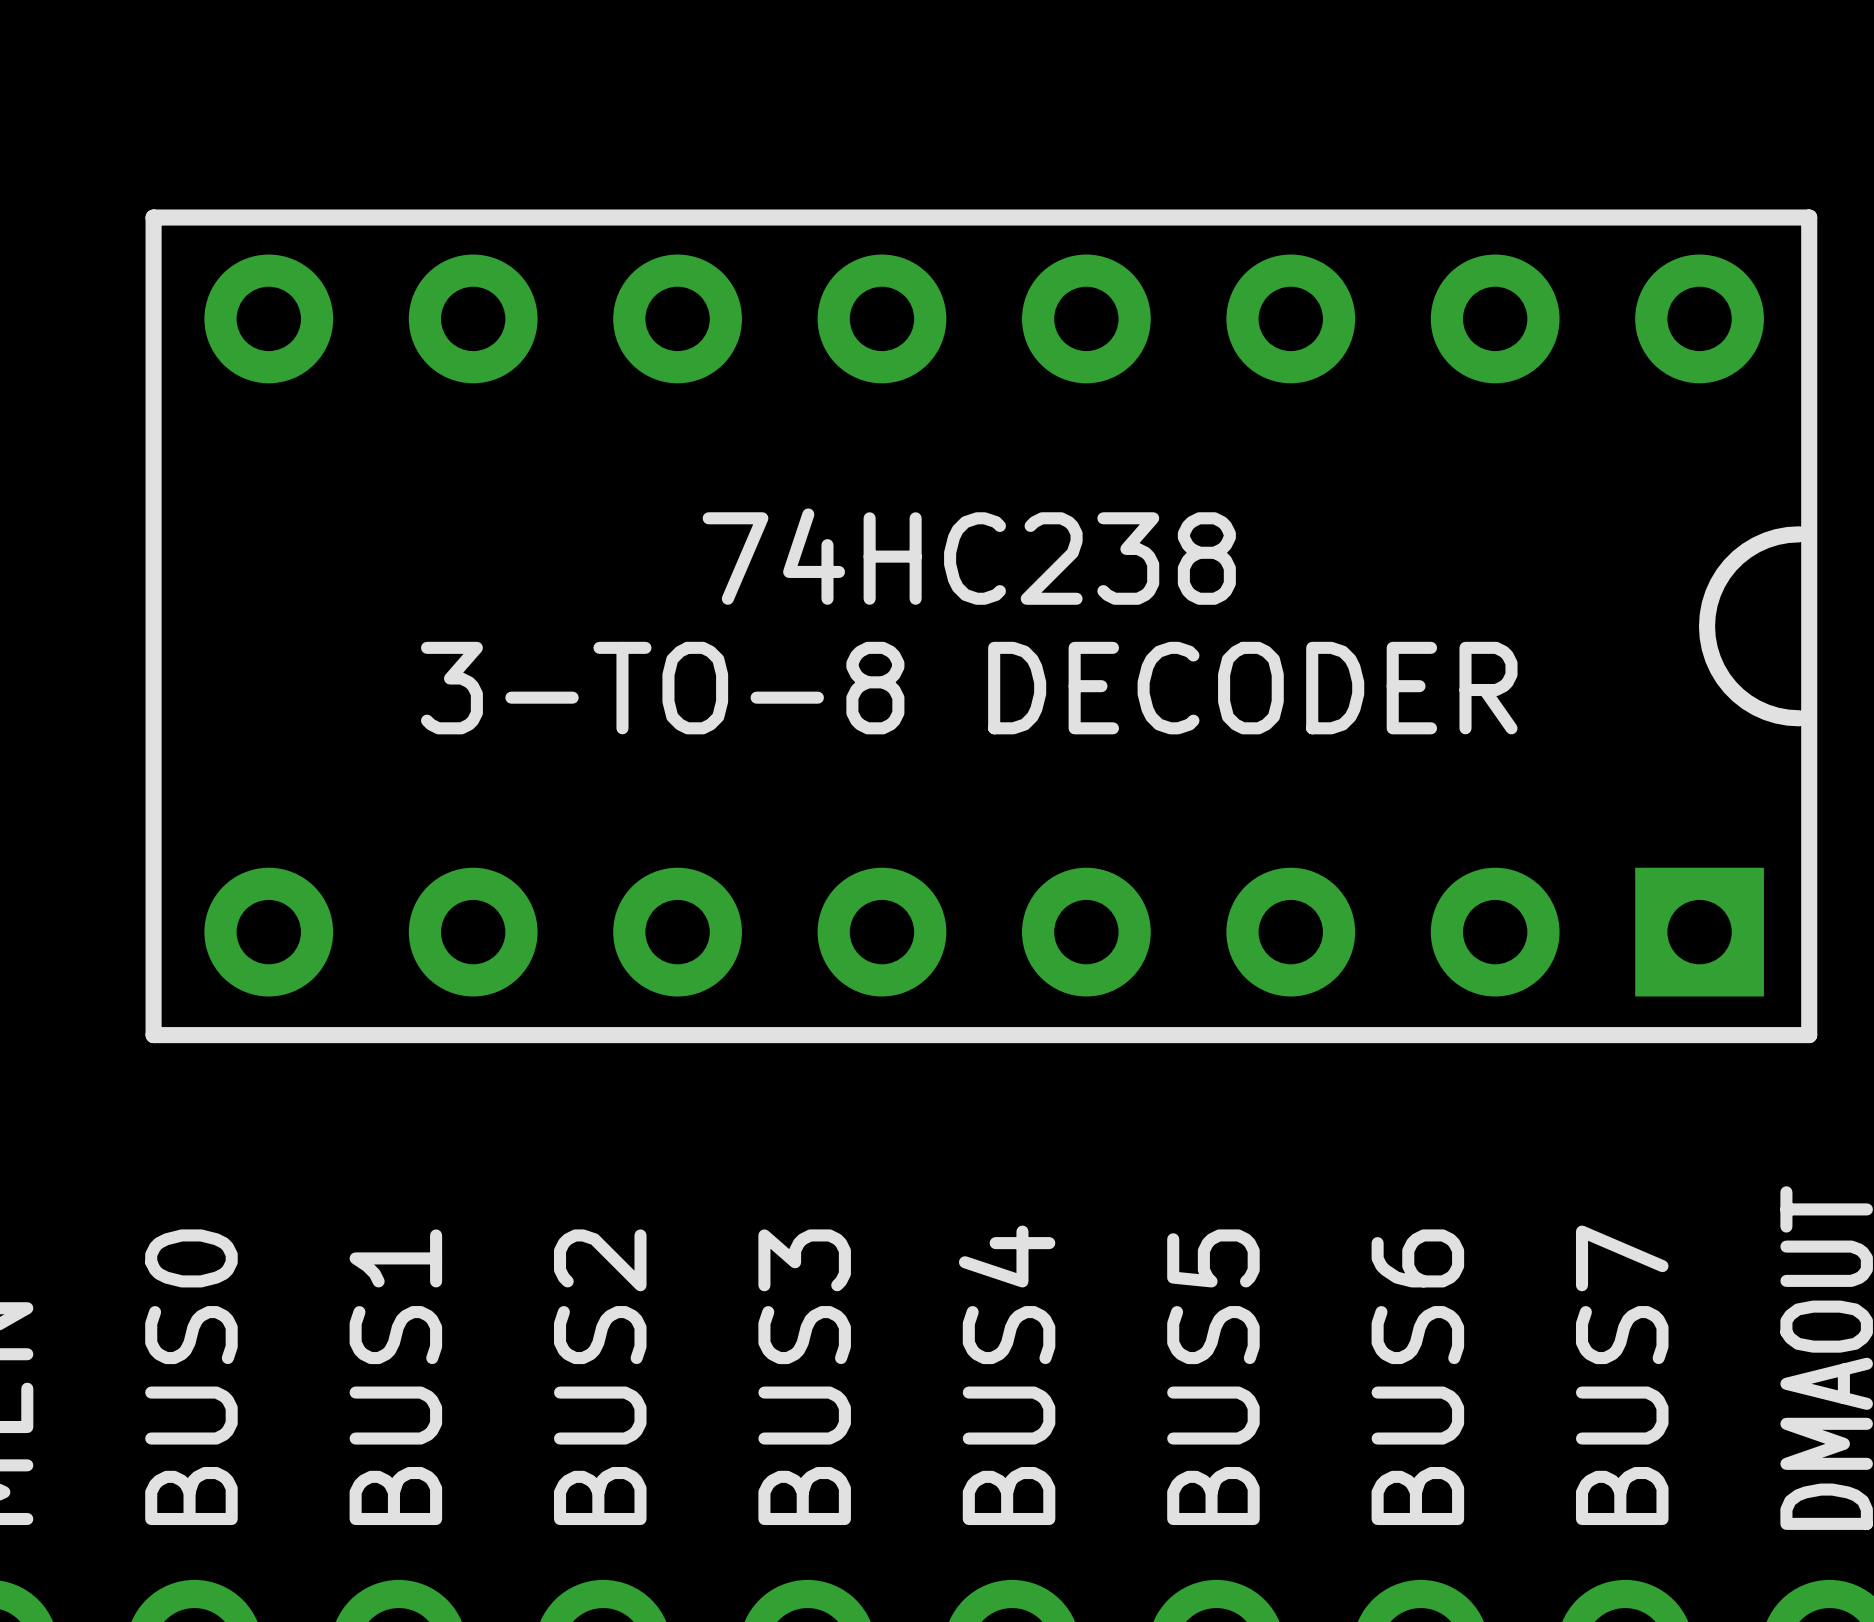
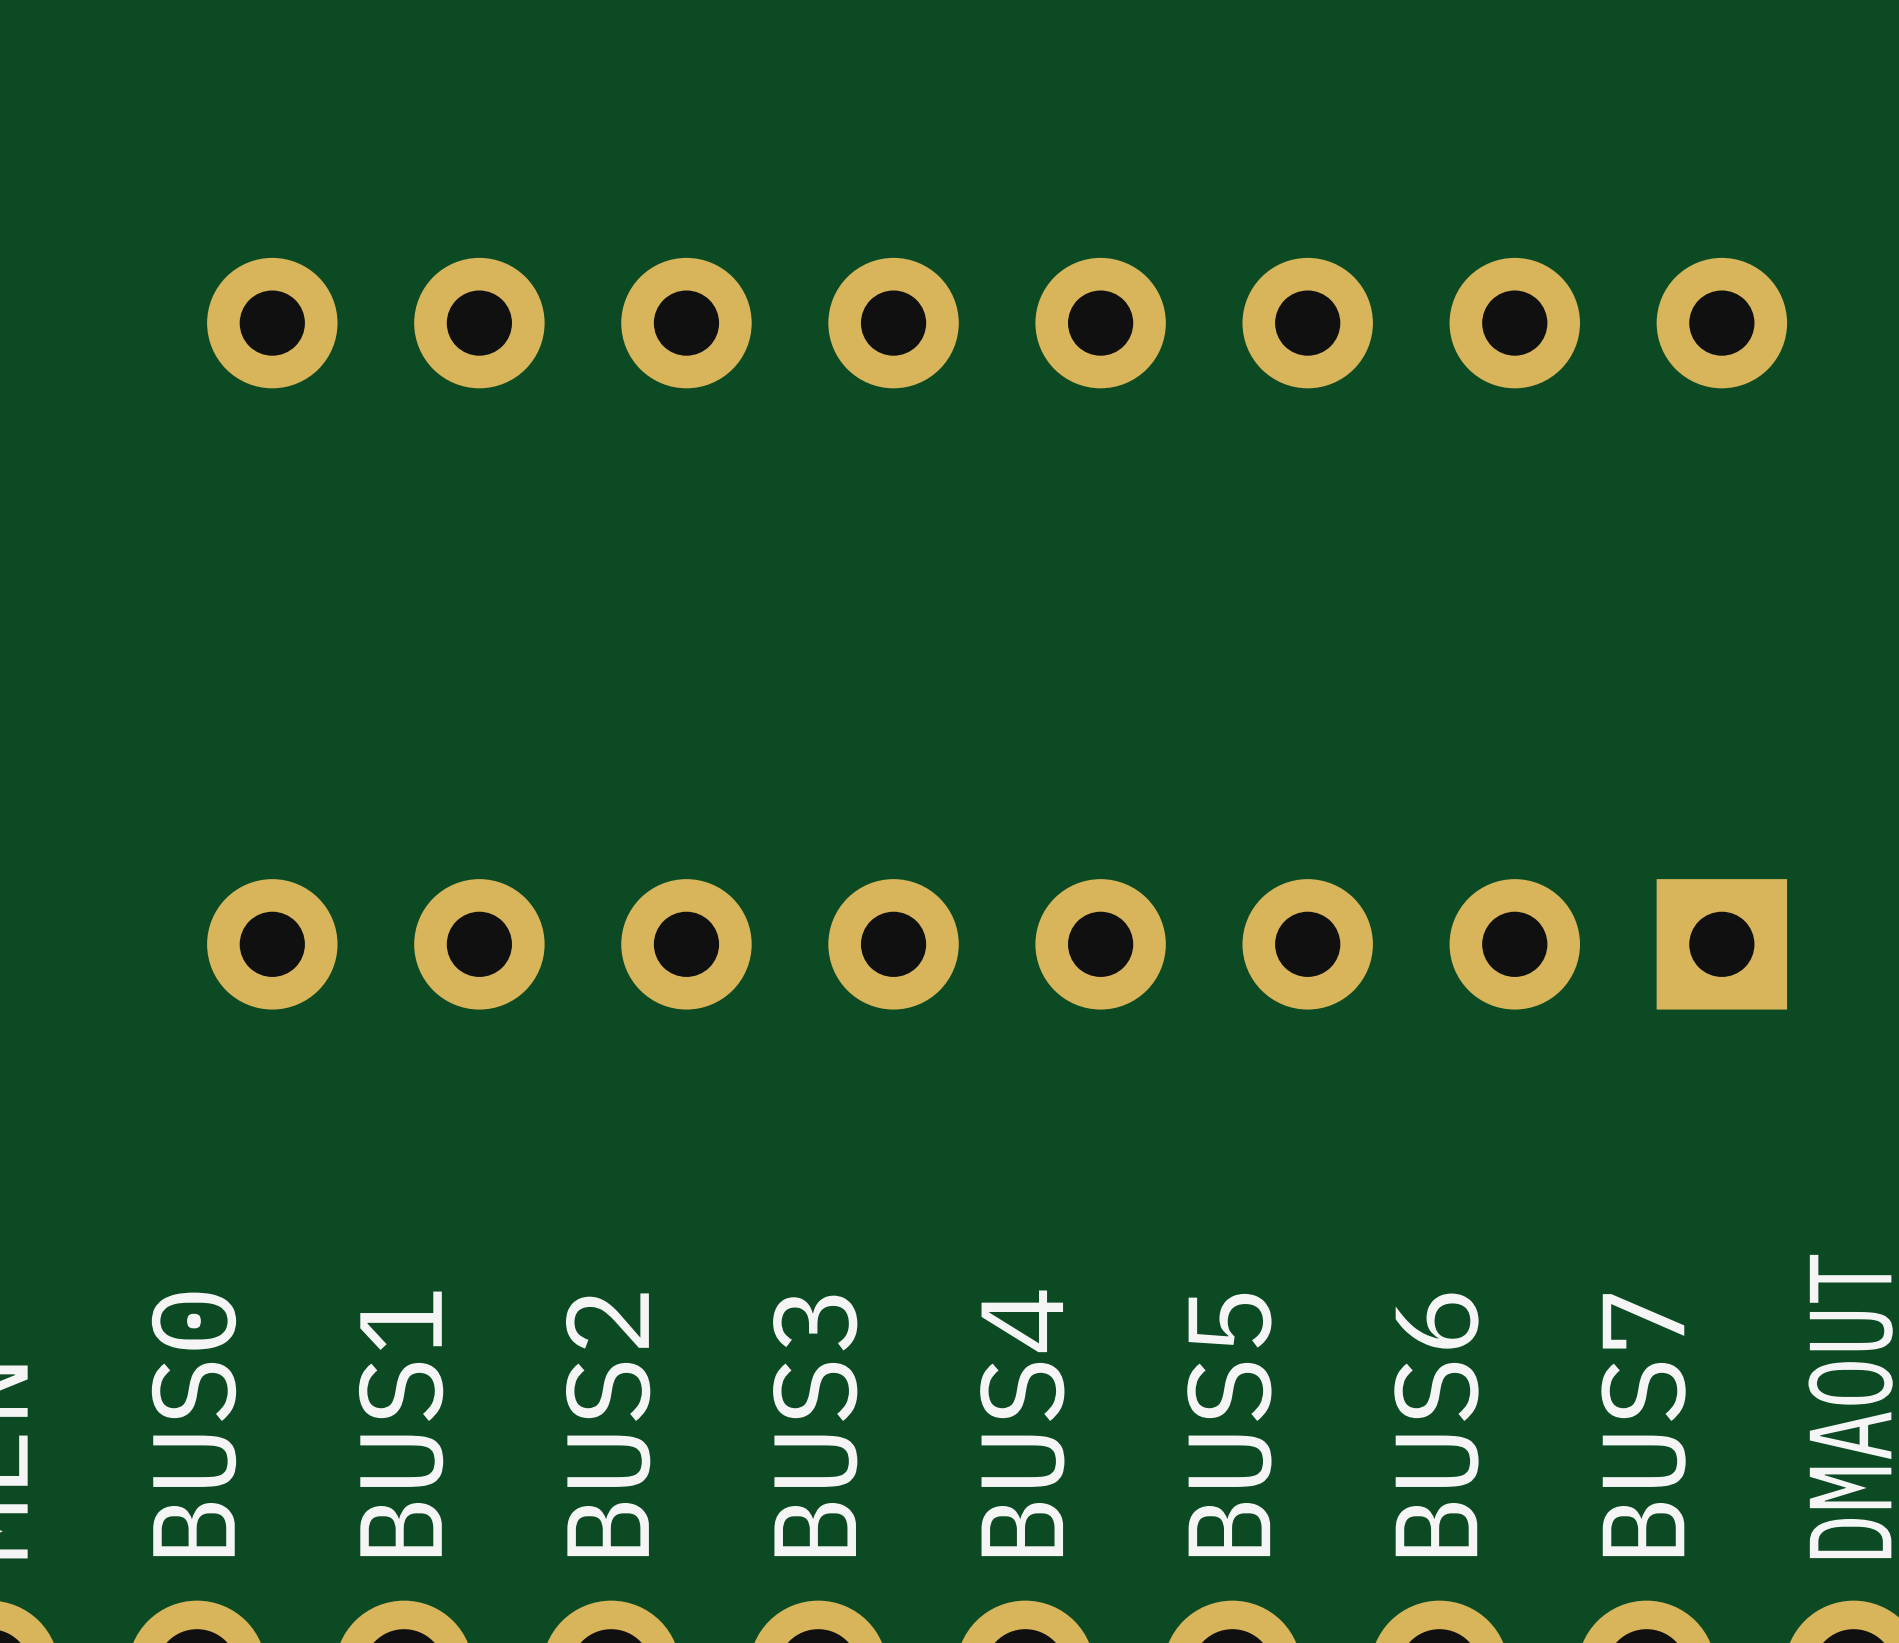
line: (1809, 217) (1809, 1035) (153, 1035) (153, 217) (1809, 217) -> none
line: (1799, 534) (1766, 540) (1738, 557) (1717, 583) (1709, 604) (1707, 626) (1709, 648) (1717, 669) (1738, 695) (1766, 712) (1799, 718) -> none
text: 74HC238 (969, 556) -> none
text: 3-TO-8 DECODER (969, 688) -> none

